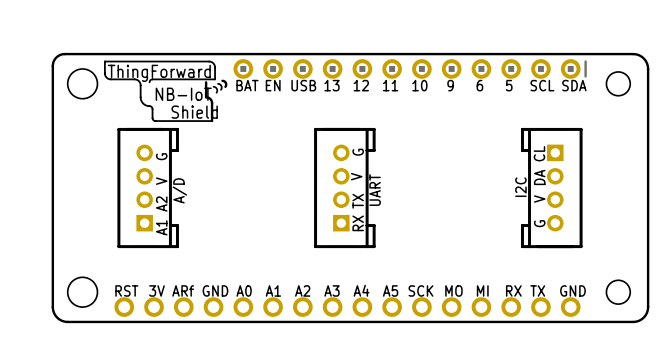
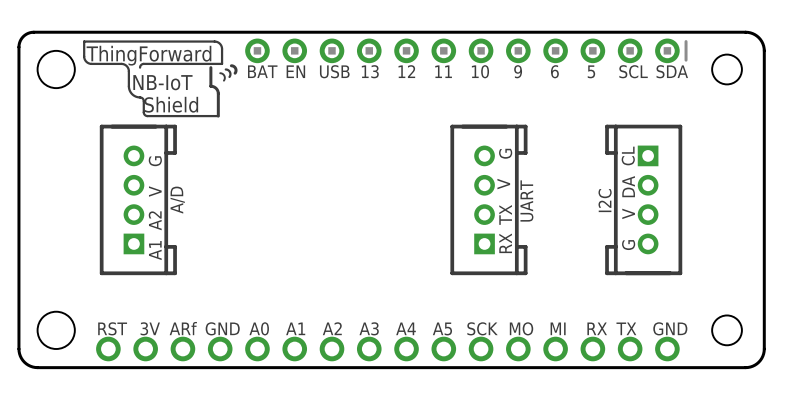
text position: G (358, 152) -> G (505, 153)
text position: V (356, 176) -> V (503, 184)
part position: (344, 188) -> (488, 199)
text position: UART (375, 190) -> UART (526, 200)
text position: TX (358, 201) -> TX (505, 214)
text position: RX (358, 223) -> RX (505, 243)

